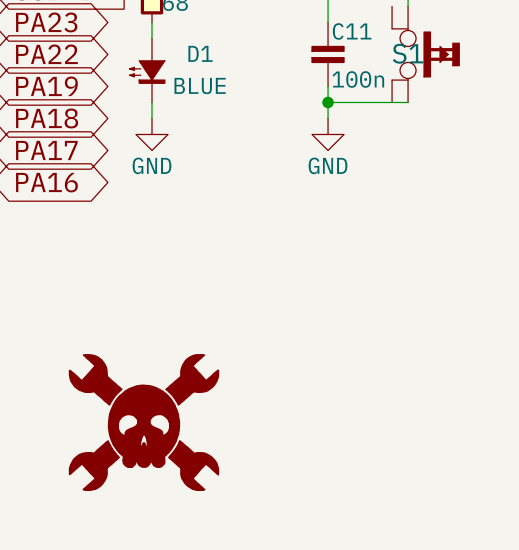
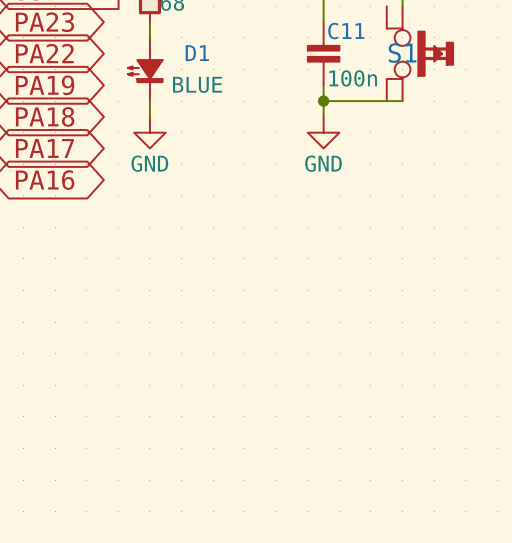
part: (144, 422) -> none

